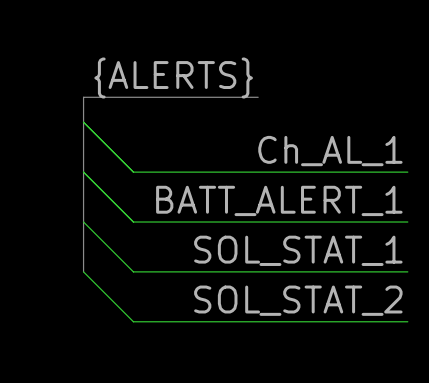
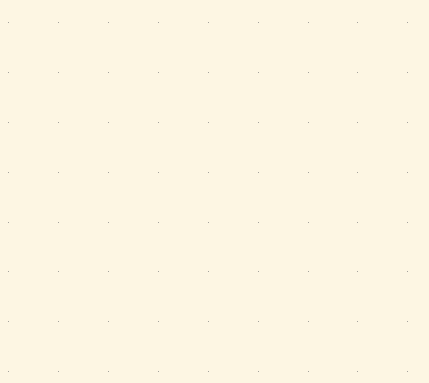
label: {ALERTS} (173, 78) -> none
bus: (258, 97) (83, 97) (83, 271) -> none
wire: (83, 122) (133, 172) (407, 172) -> none
label: Ch_AL_1 (330, 151) -> none
wire: (83, 172) (133, 222) (407, 222) -> none
label: BATT_ALERT_1 (279, 200) -> none
wire: (83, 222) (133, 271) (407, 271) -> none
label: SOL_STAT_1 (298, 250) -> none
wire: (83, 271) (133, 321) (407, 321) -> none
label: SOL_STAT_2 (298, 300) -> none

